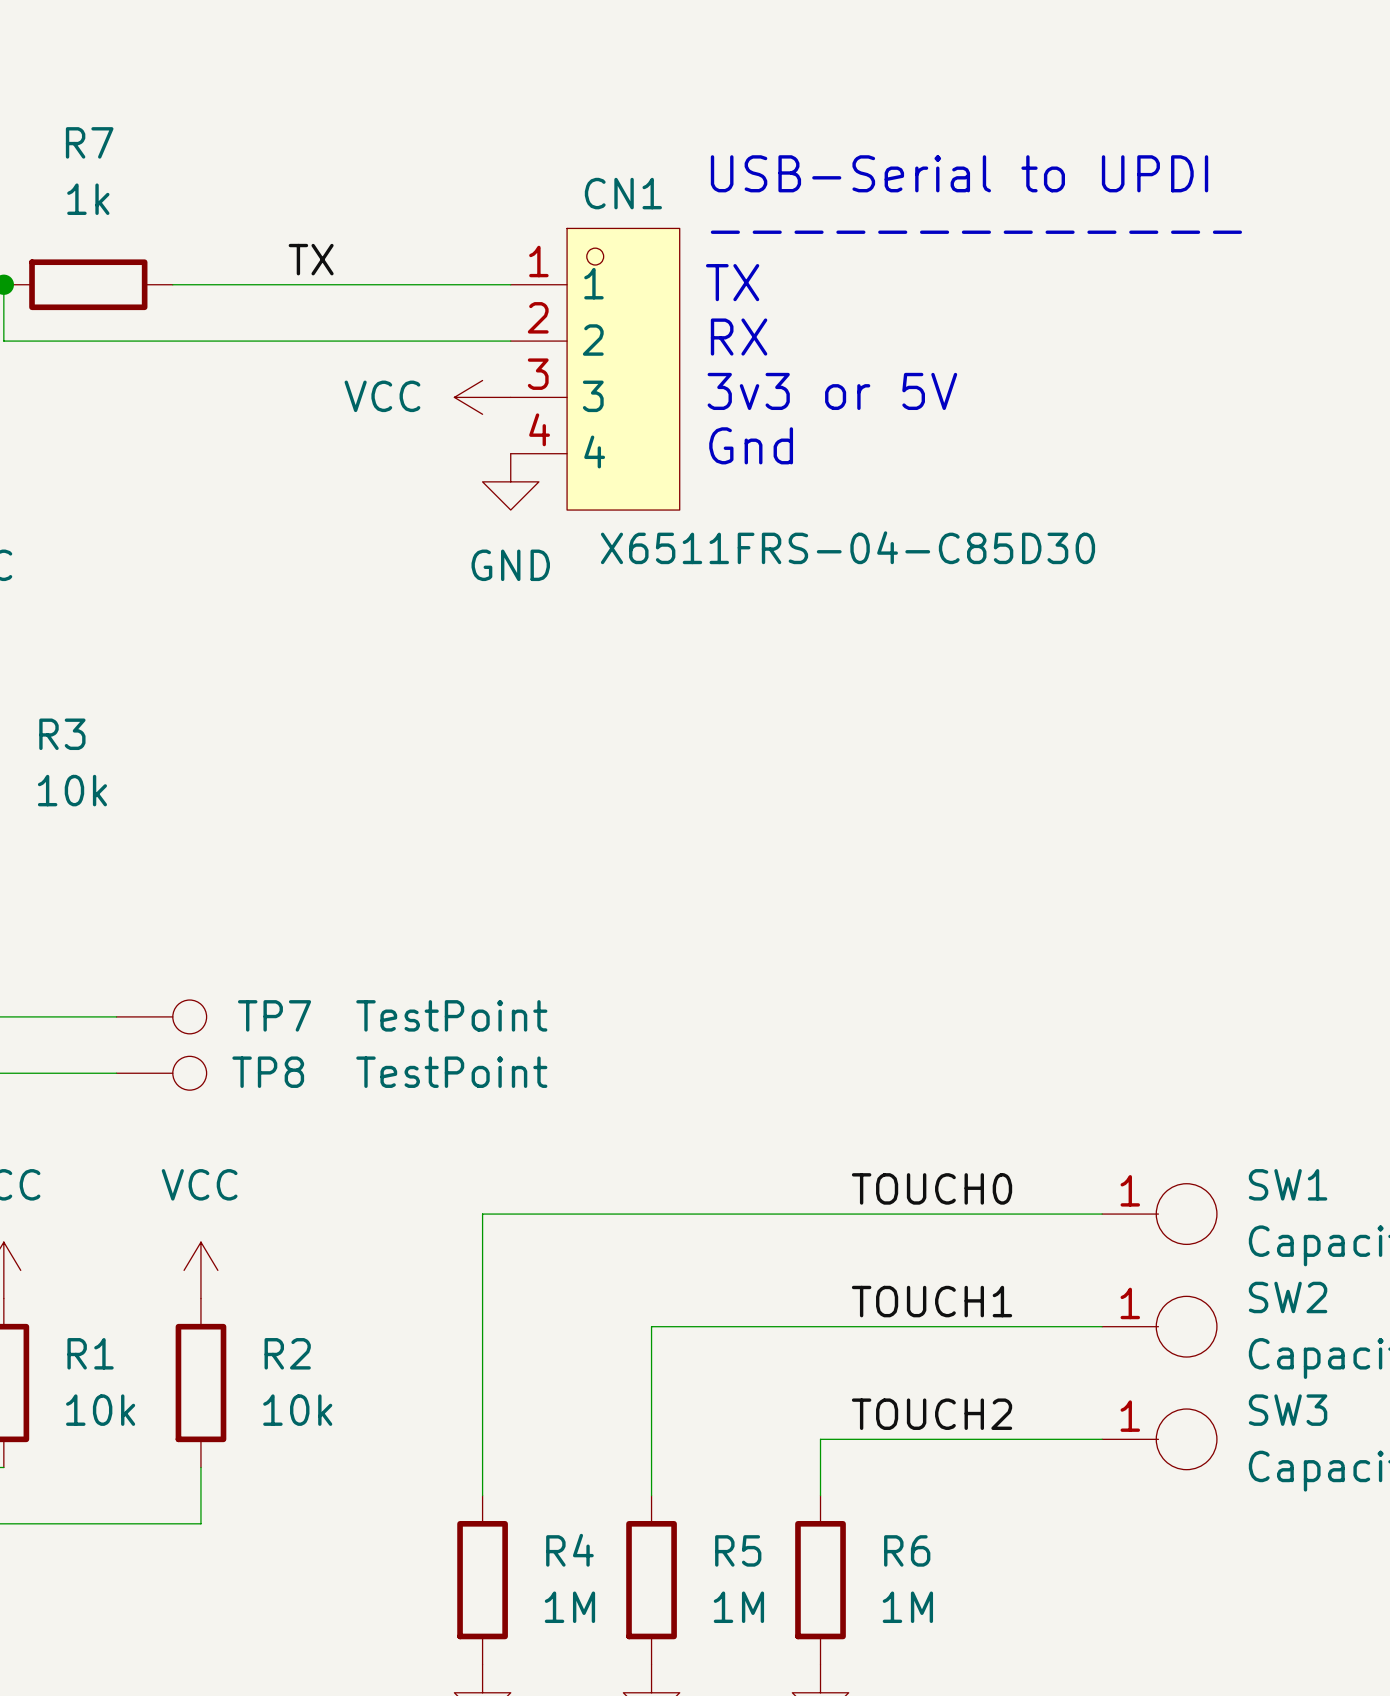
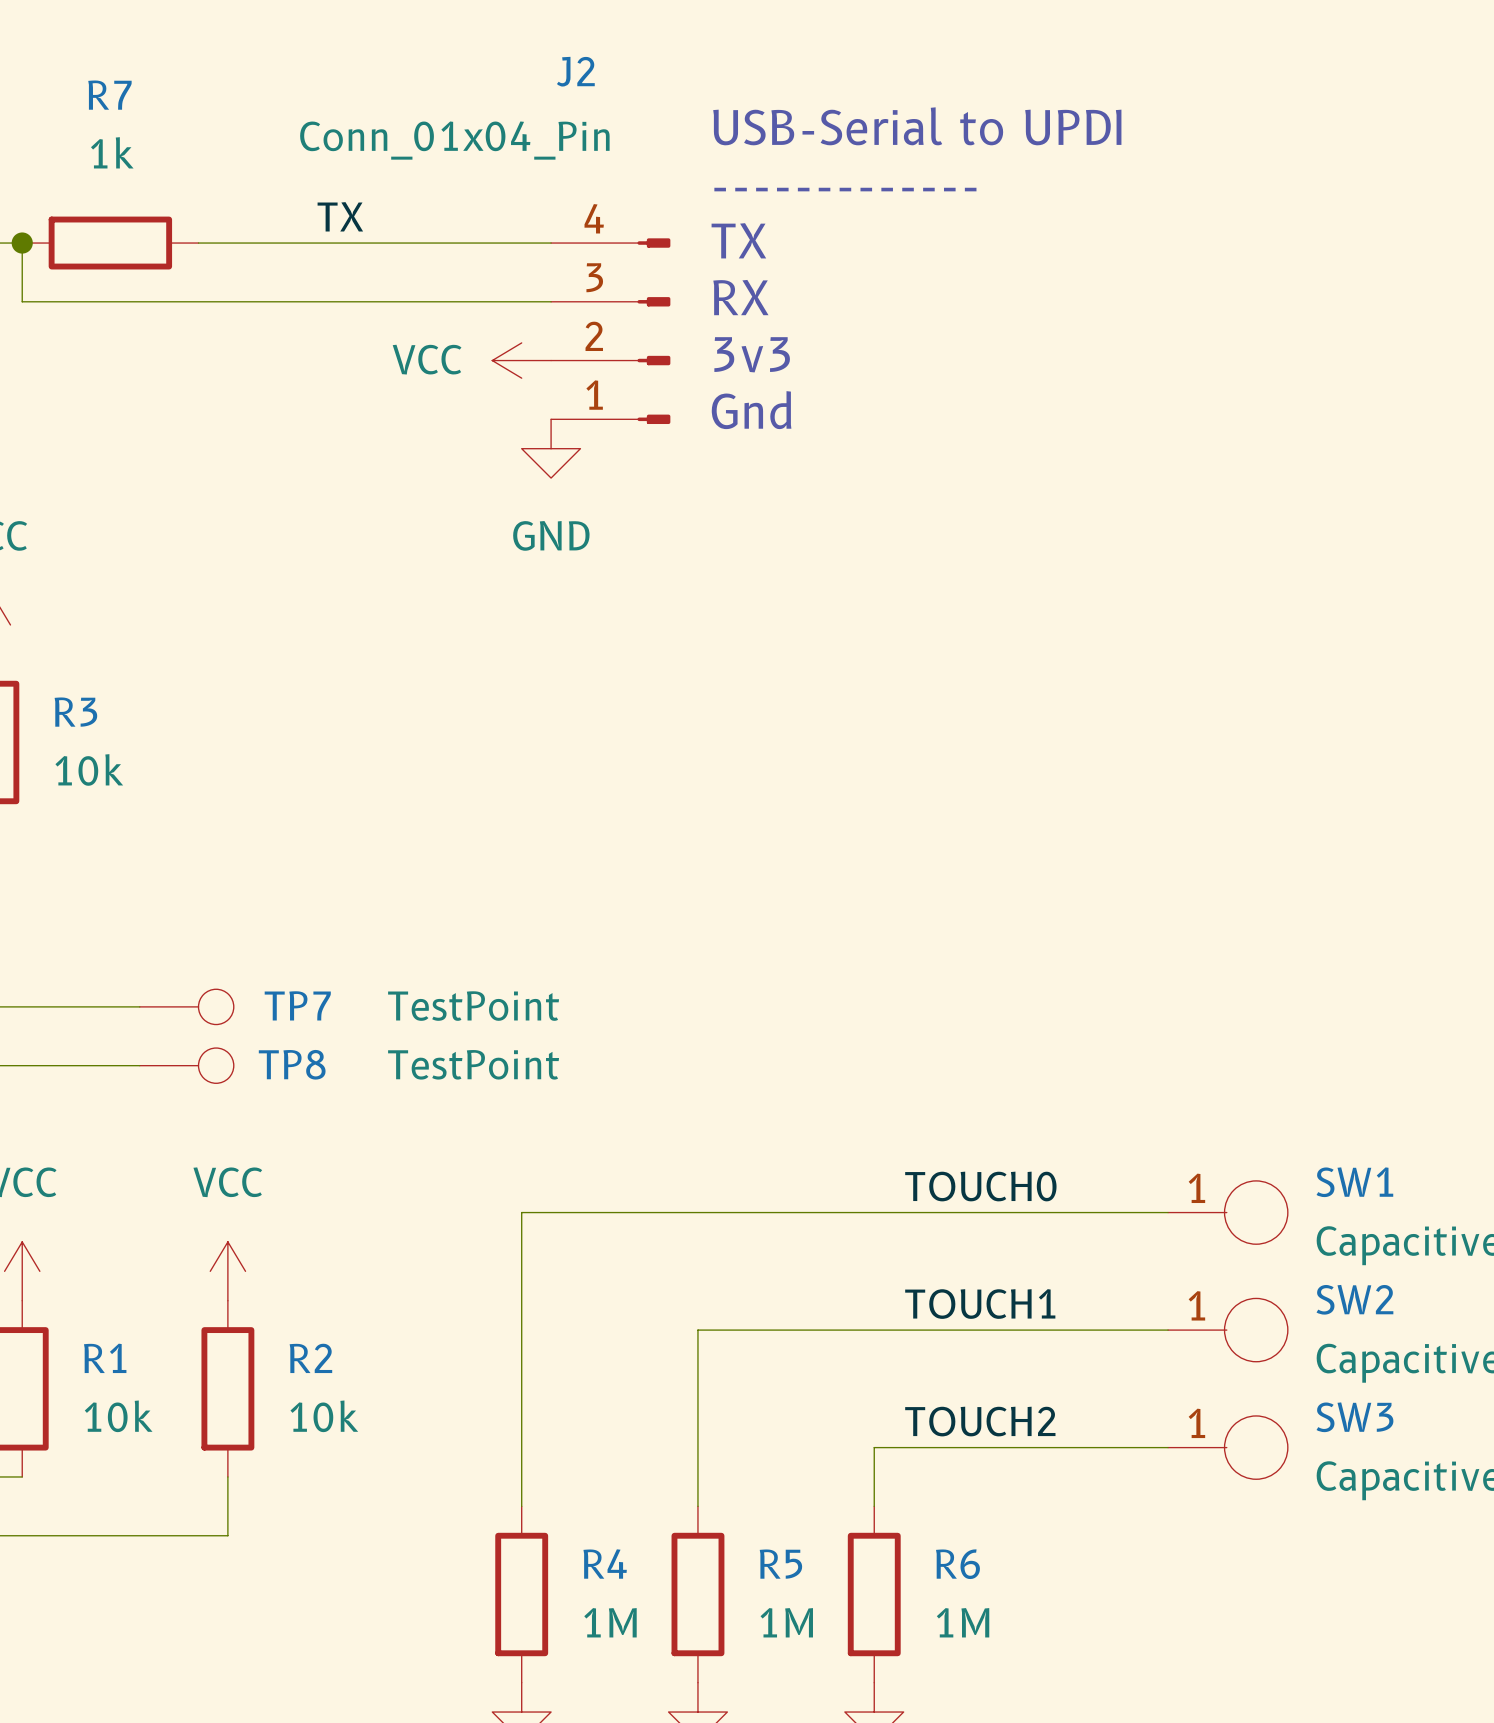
text position: USB-Serial to UPDI (959, 173) -> USB-Serial to UPDI (917, 126)
text position: ------------- (976, 232) -> ------------- (845, 189)
text position: TX (732, 282) -> TX (738, 240)
text position: RX (739, 337) -> RX (740, 297)
J2: none -> Conn_01x04_Pin (610, 331)
CN1: X6511FRS-04-C85D30 (595, 369) -> none
text: none -> 3v3 (752, 354)
text: 3v3 or 5V (832, 391) -> none
text position: Gnd (751, 445) -> Gnd (751, 410)

